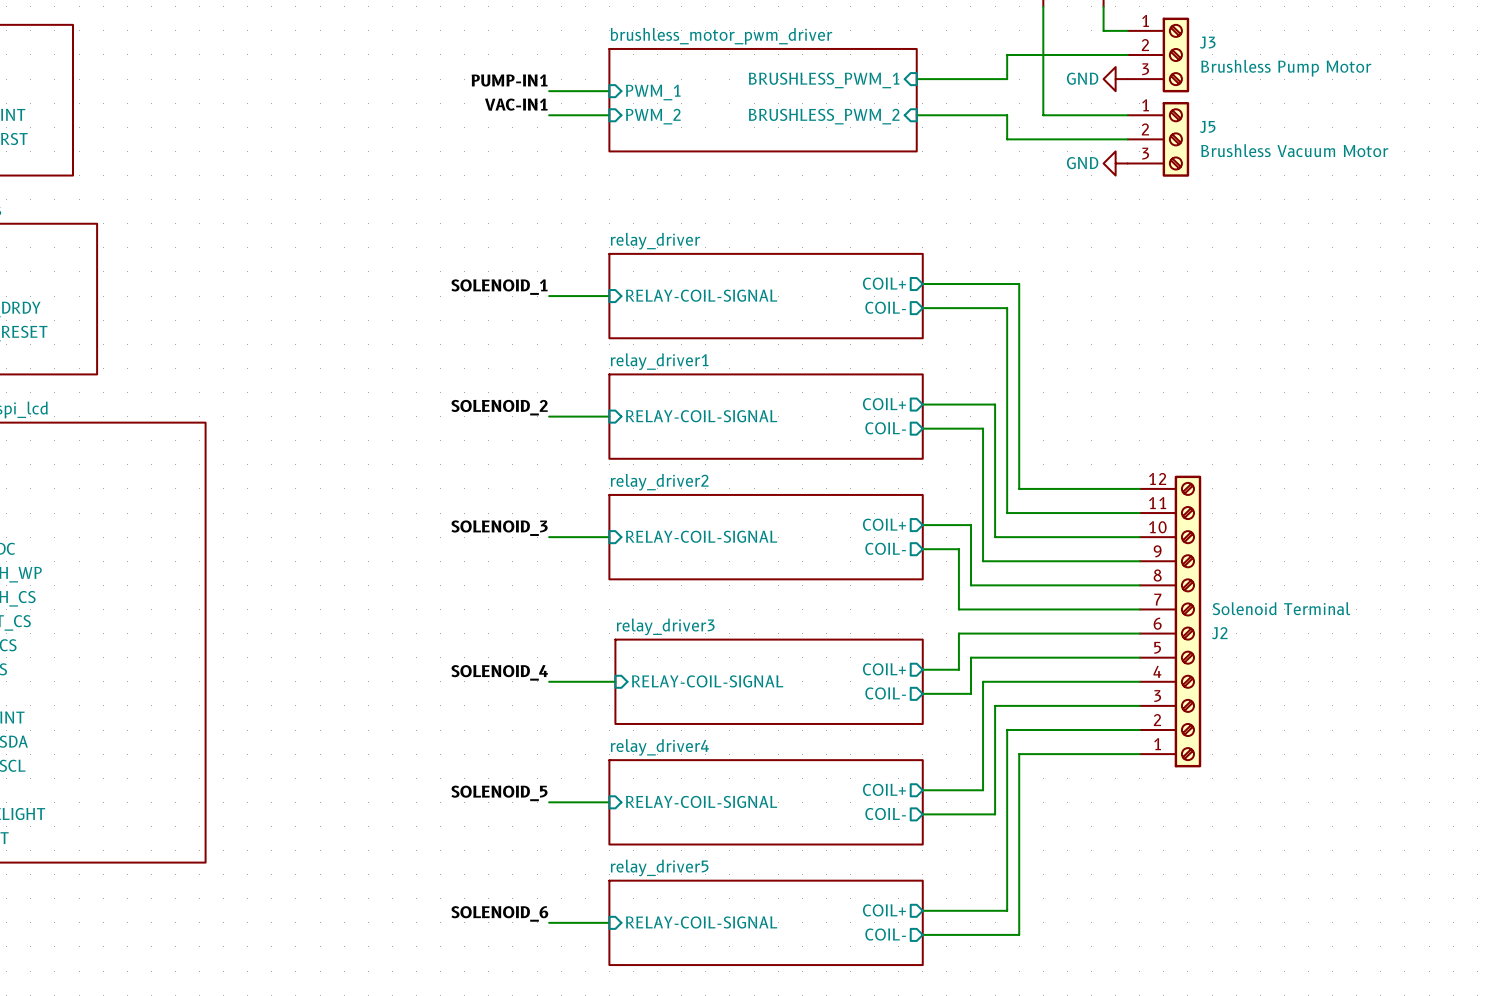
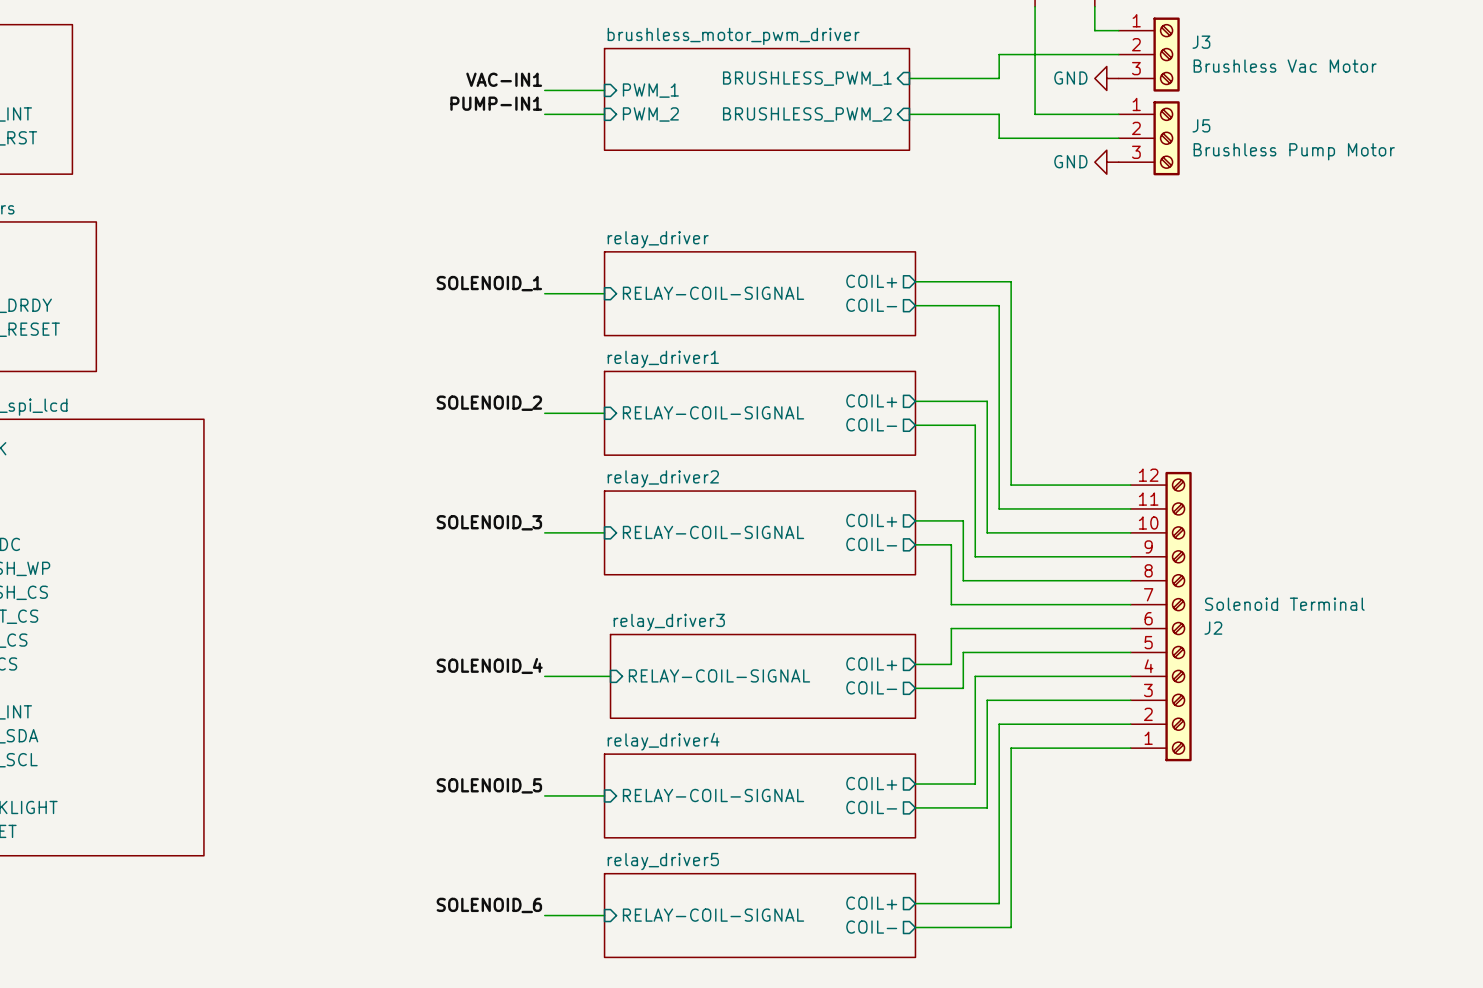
J3 value: Brushless Pump Motor (1286, 68) -> Brushless Vac Motor (1285, 66)
label: PUMP-IN1 (509, 80) -> VAC-IN1 (504, 79)
label: VAC-IN1 (516, 104) -> PUMP-IN1 (496, 103)
J5 value: Brushless Vacuum Motor (1294, 150) -> Brushless Pump Motor (1294, 151)

